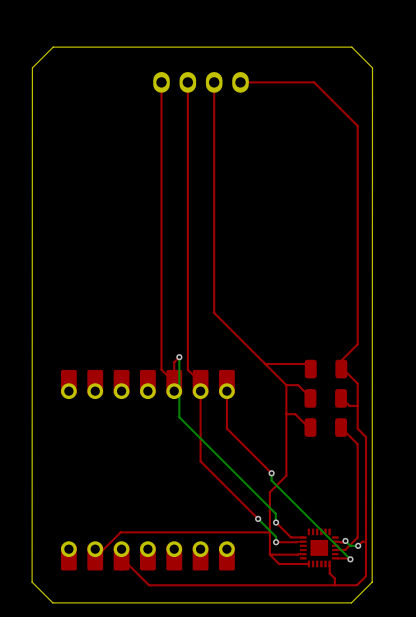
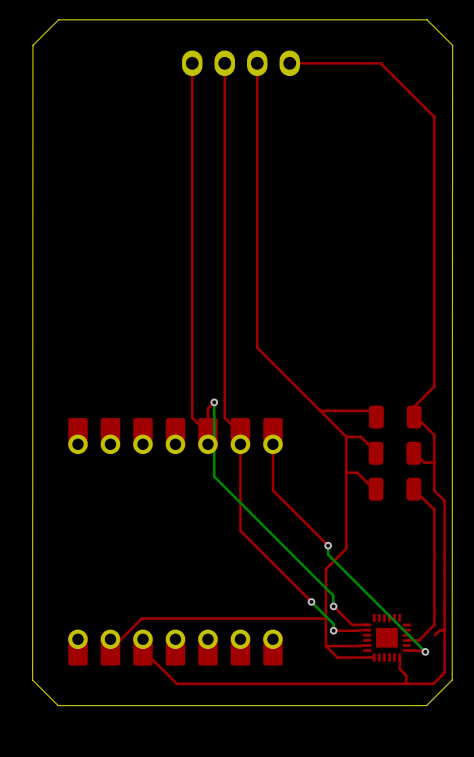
top track: (345, 540) (335, 541) -> none
bottom track: (345, 540) (350, 545) (358, 545) -> none
via: (345, 540) -> none
via: (358, 545) -> none

